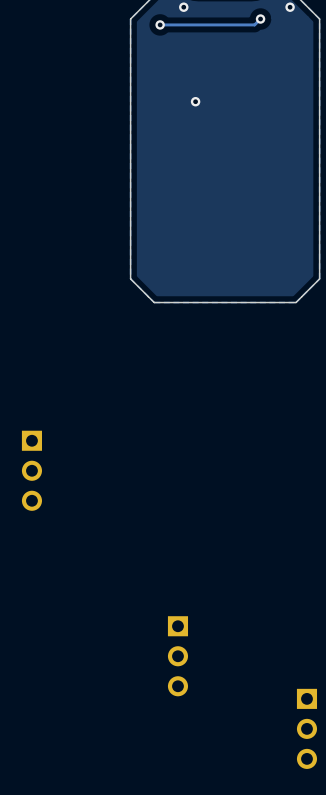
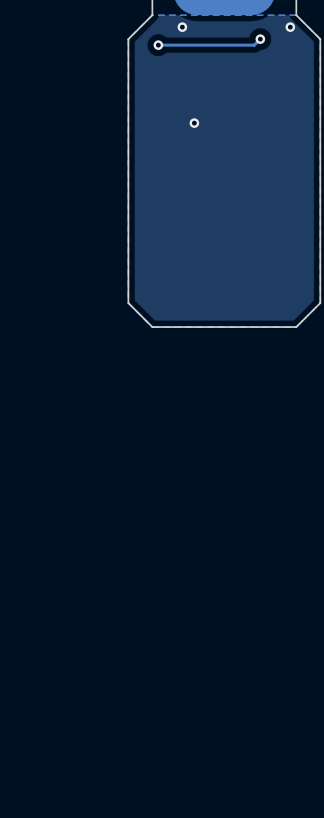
part: (31, 470) -> none
part: (177, 656) -> none
part: (306, 728) -> none

